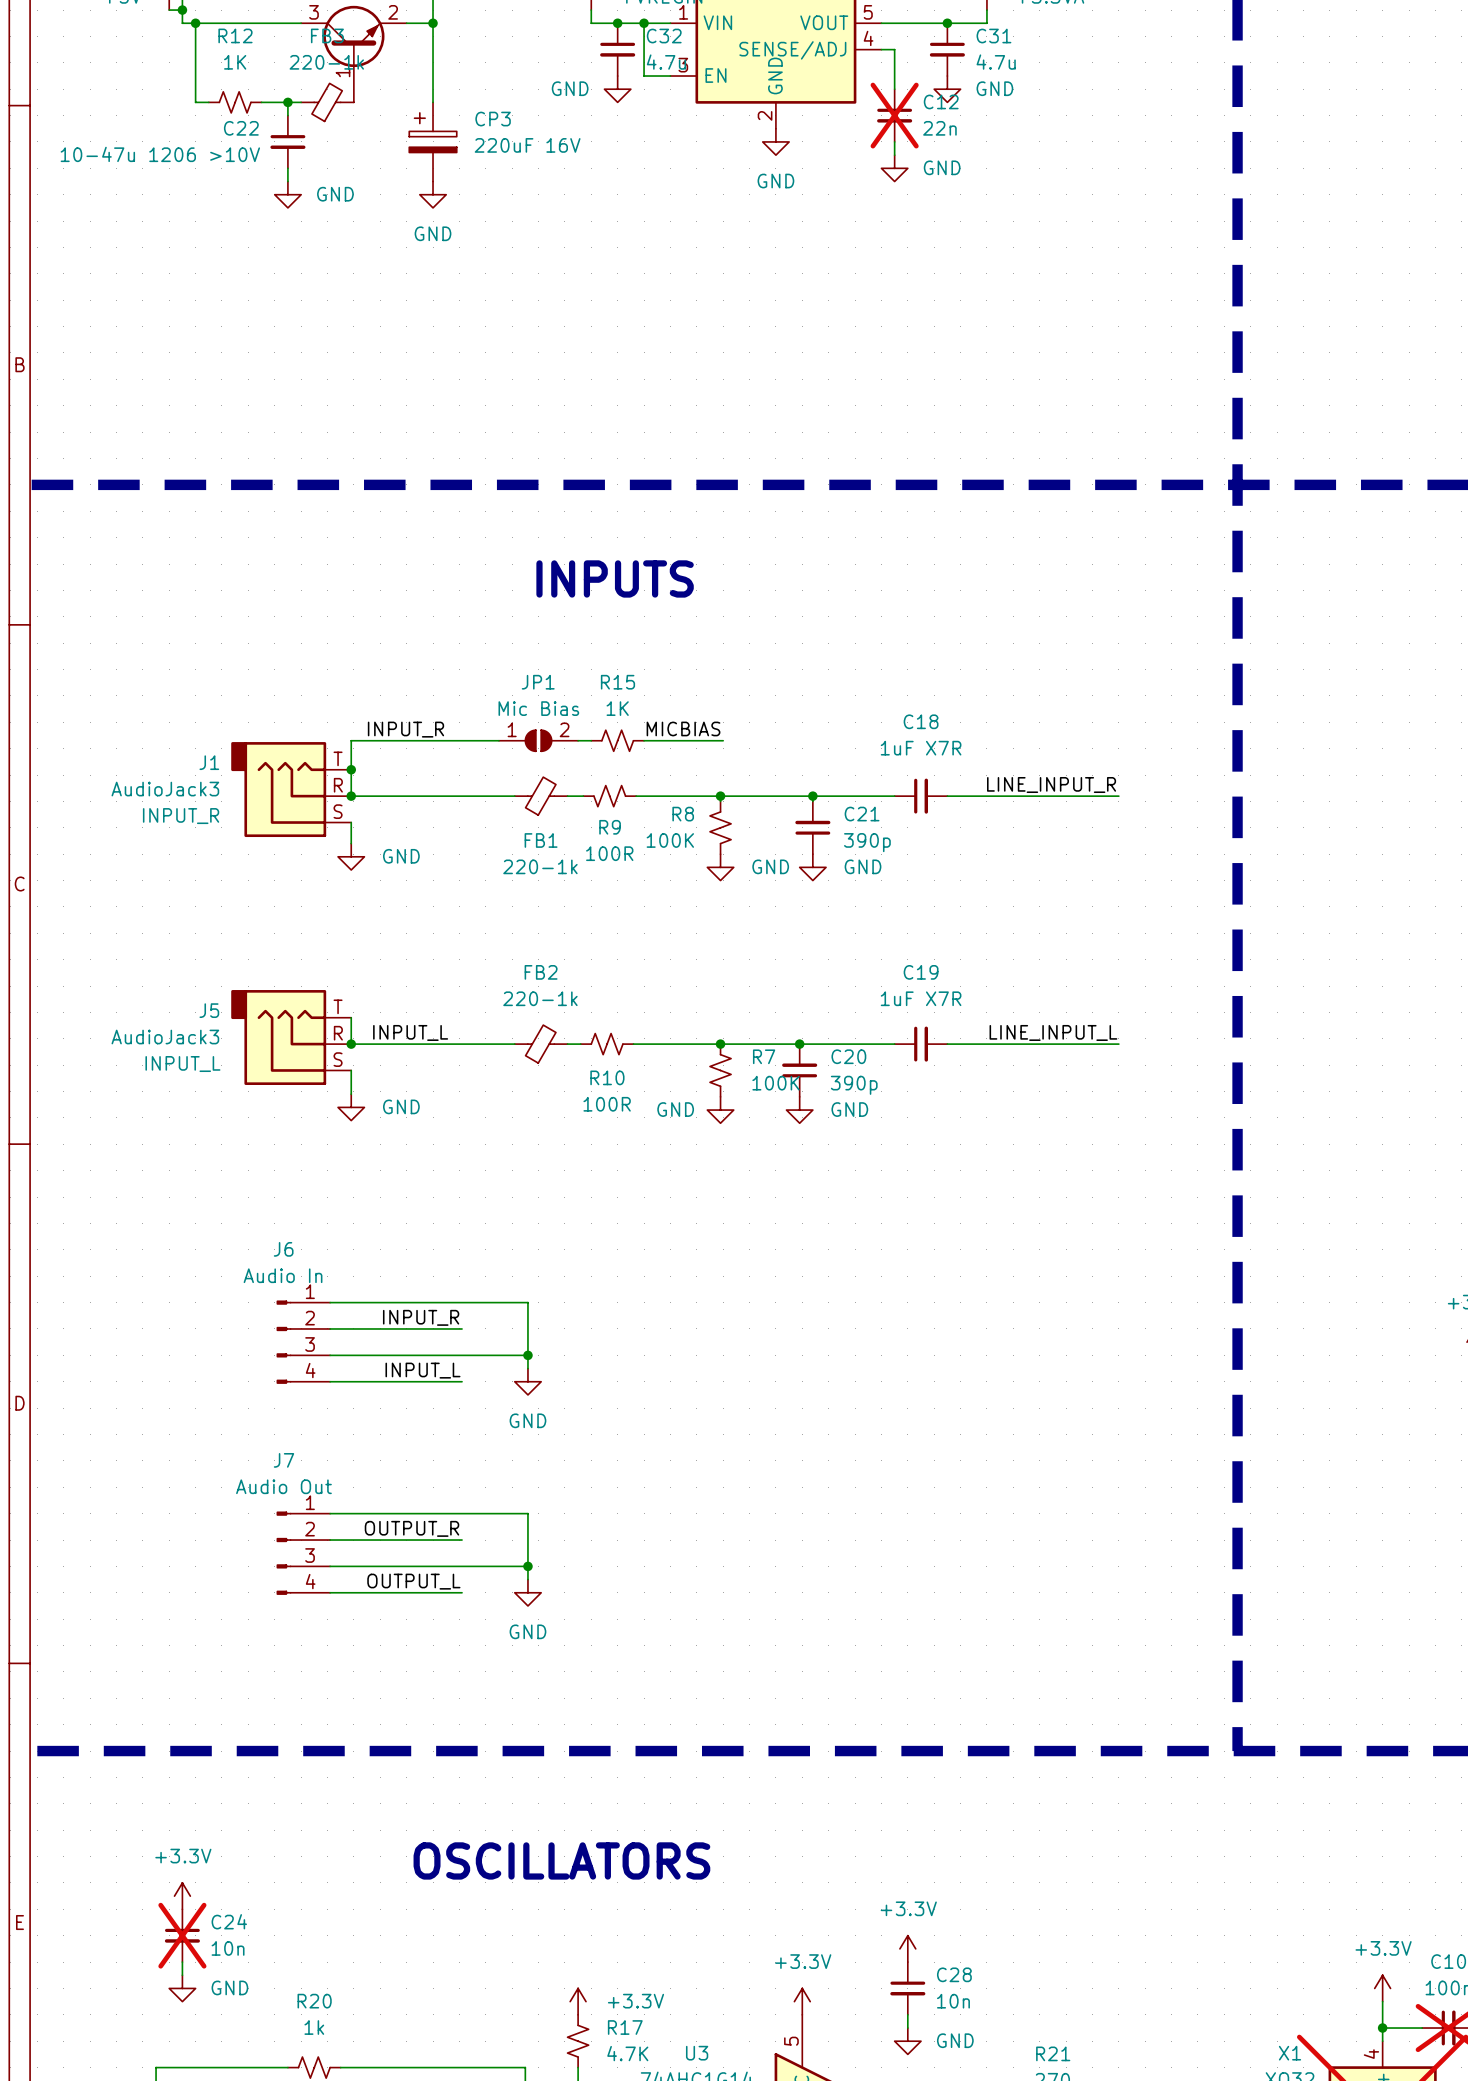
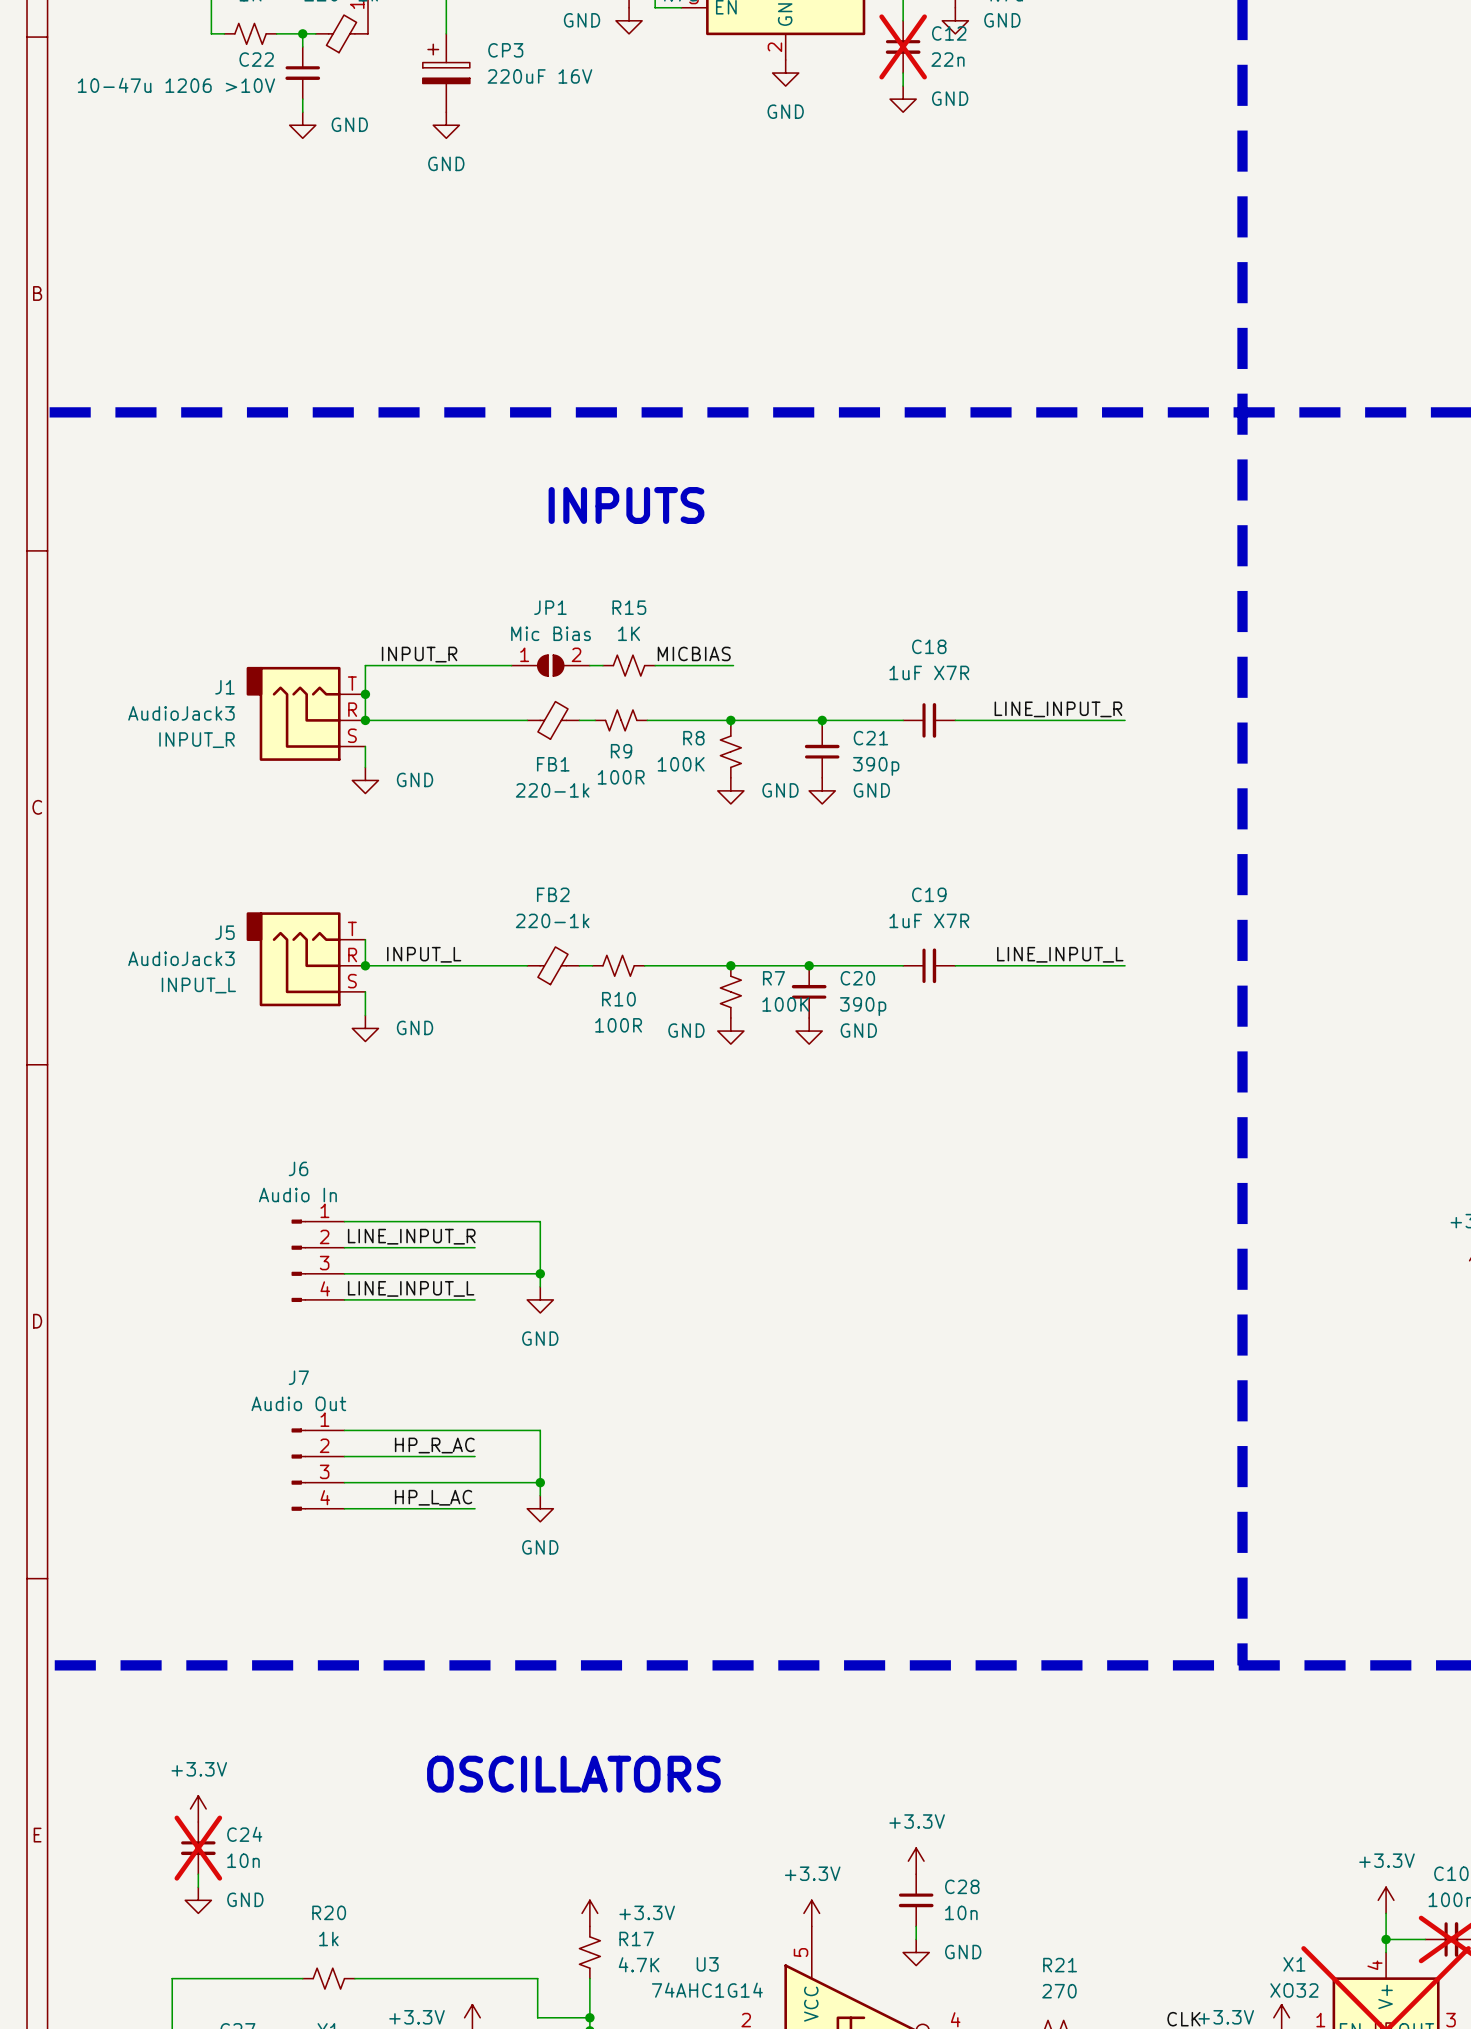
label: INPUT_R (421, 1317) -> LINE_INPUT_R (411, 1236)
label: INPUT_L (422, 1370) -> LINE_INPUT_L (411, 1288)
label: OUTPUT_R (412, 1528) -> none
label: none -> HP_R_AC (434, 1445)
label: OUTPUT_L (413, 1581) -> none
label: none -> HP_L_AC (433, 1497)

